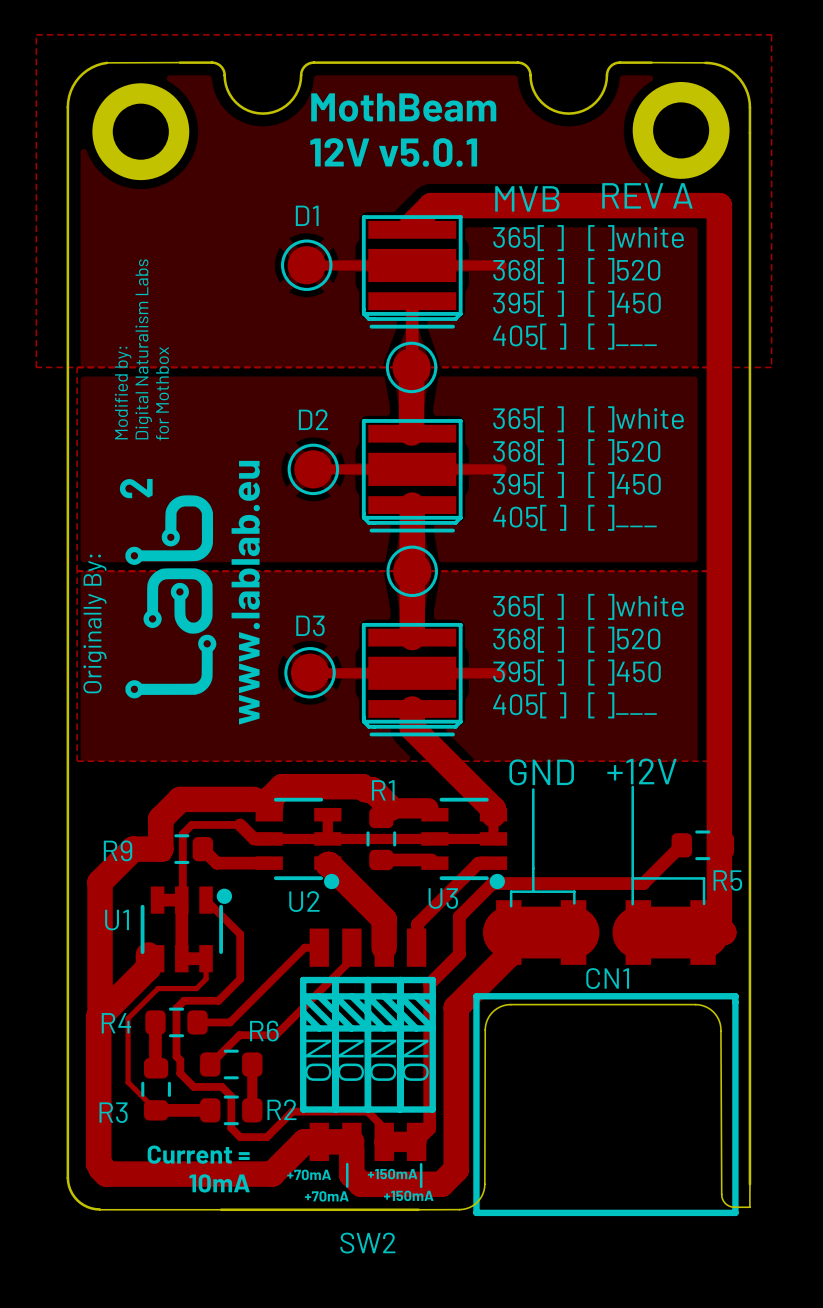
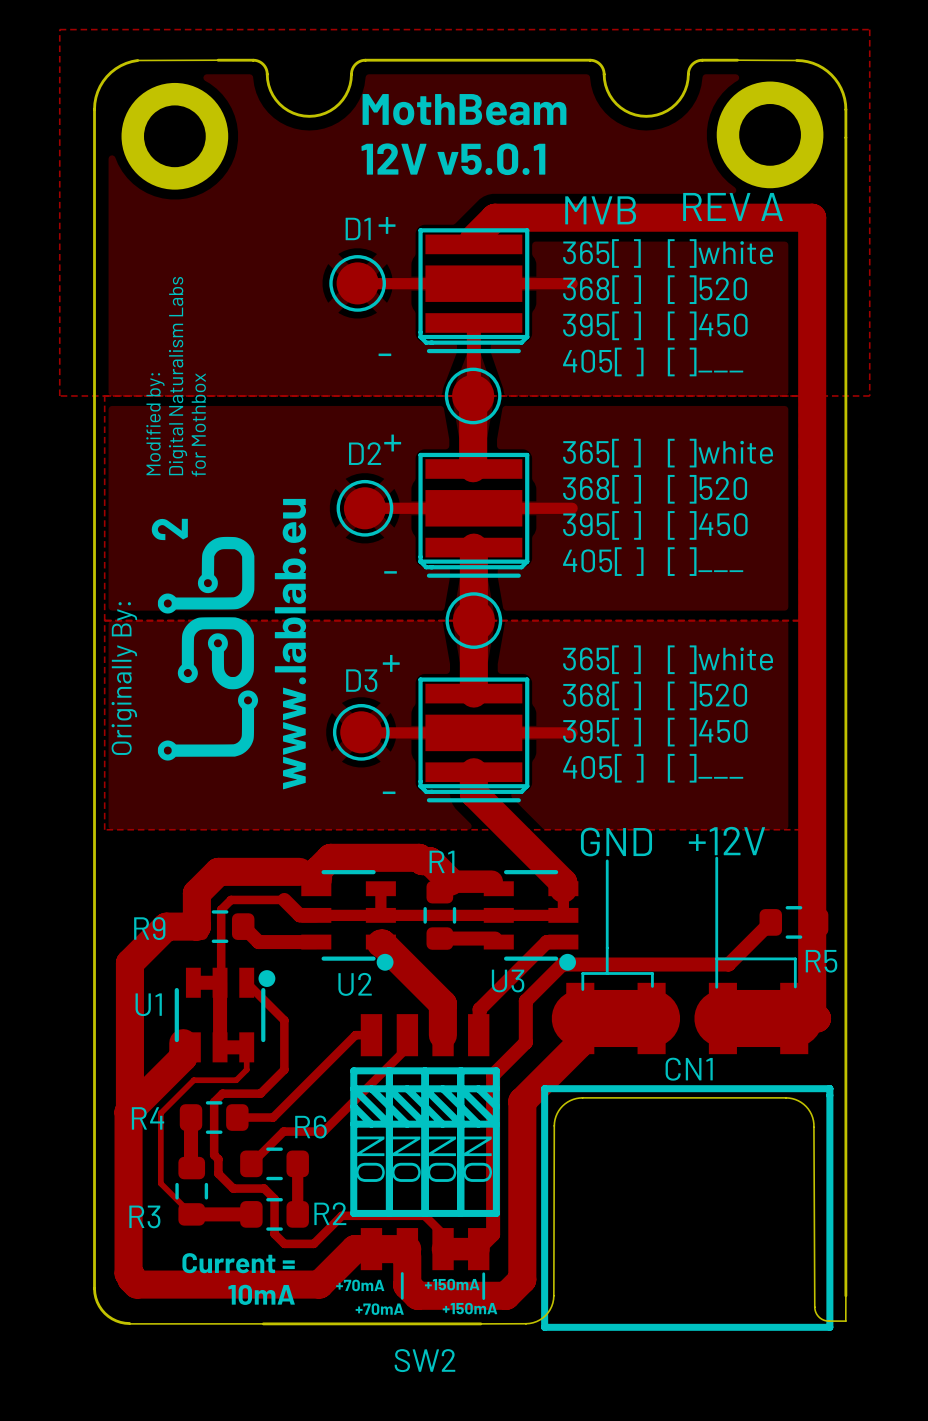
text: none -> + (387, 225)
text: none -> - (384, 354)
text: none -> + (392, 443)
text: none -> - (390, 572)
text: none -> + (391, 663)
text: none -> - (389, 792)

